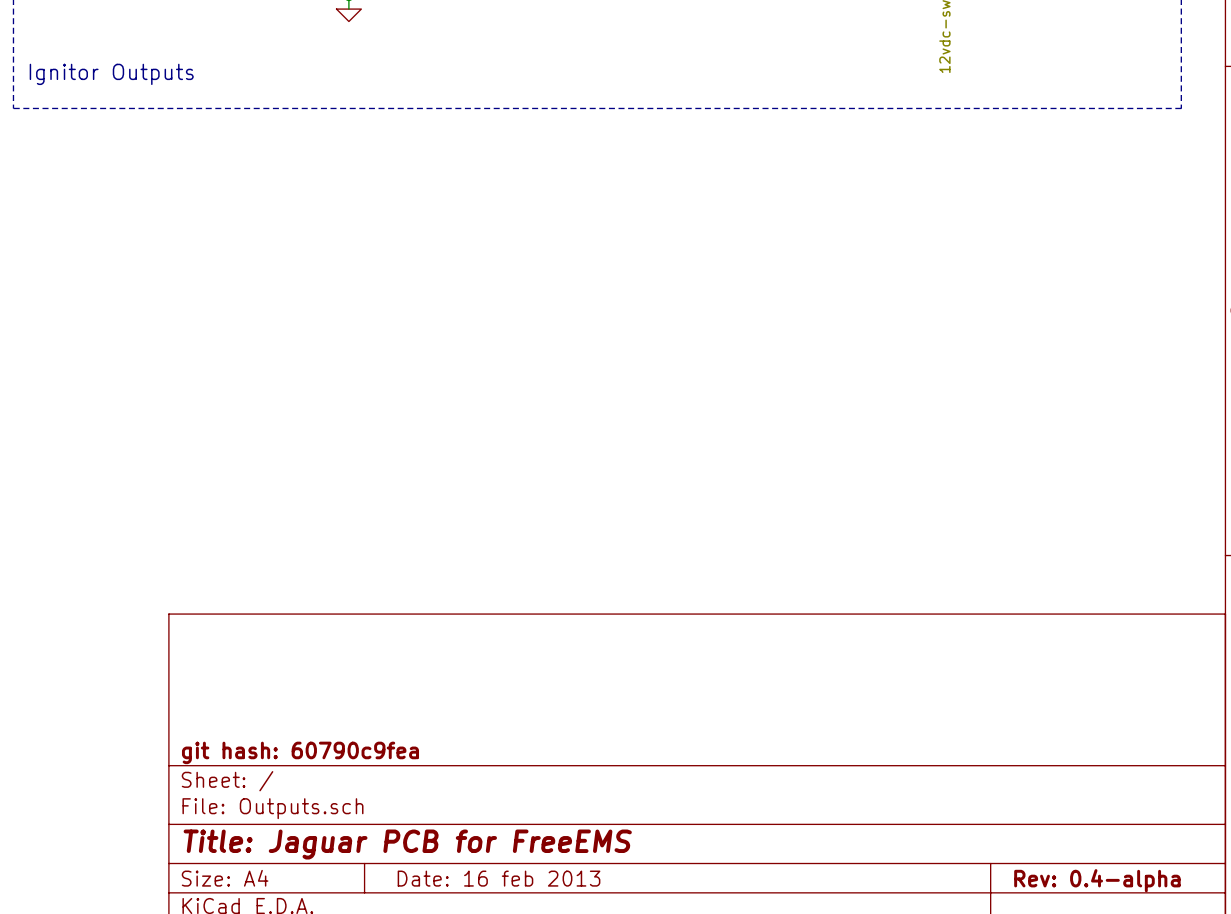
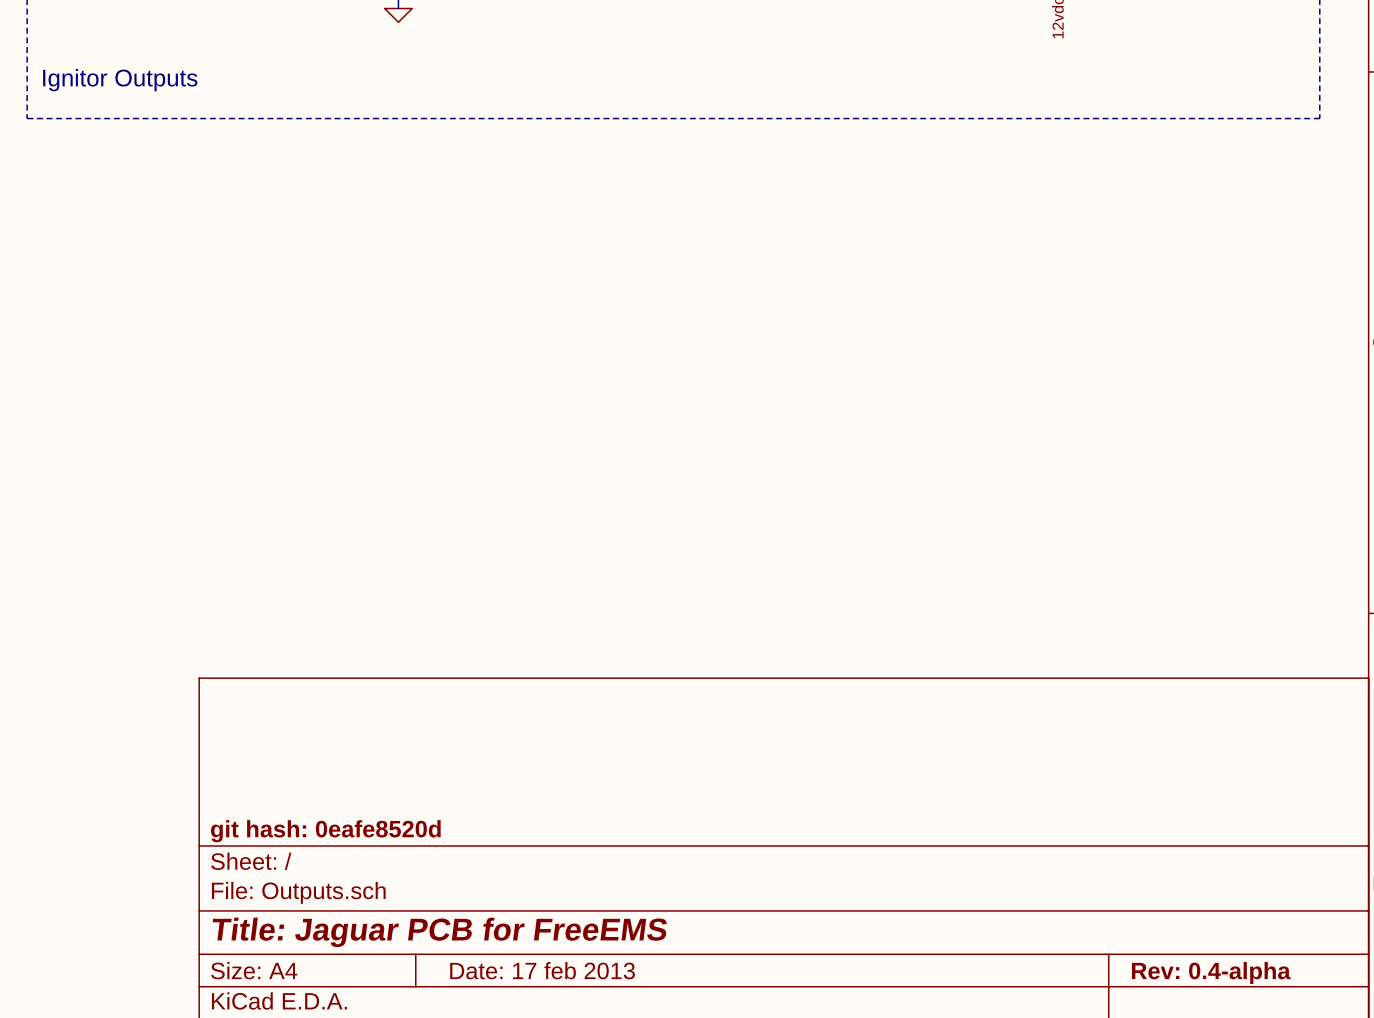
title block: git hash: 60790c9fea (300, 752) -> git hash: 0eafe8520d (325, 831)
title block: Date: 16 feb 2013 (499, 878) -> Date: 17 feb 2013 (542, 970)

